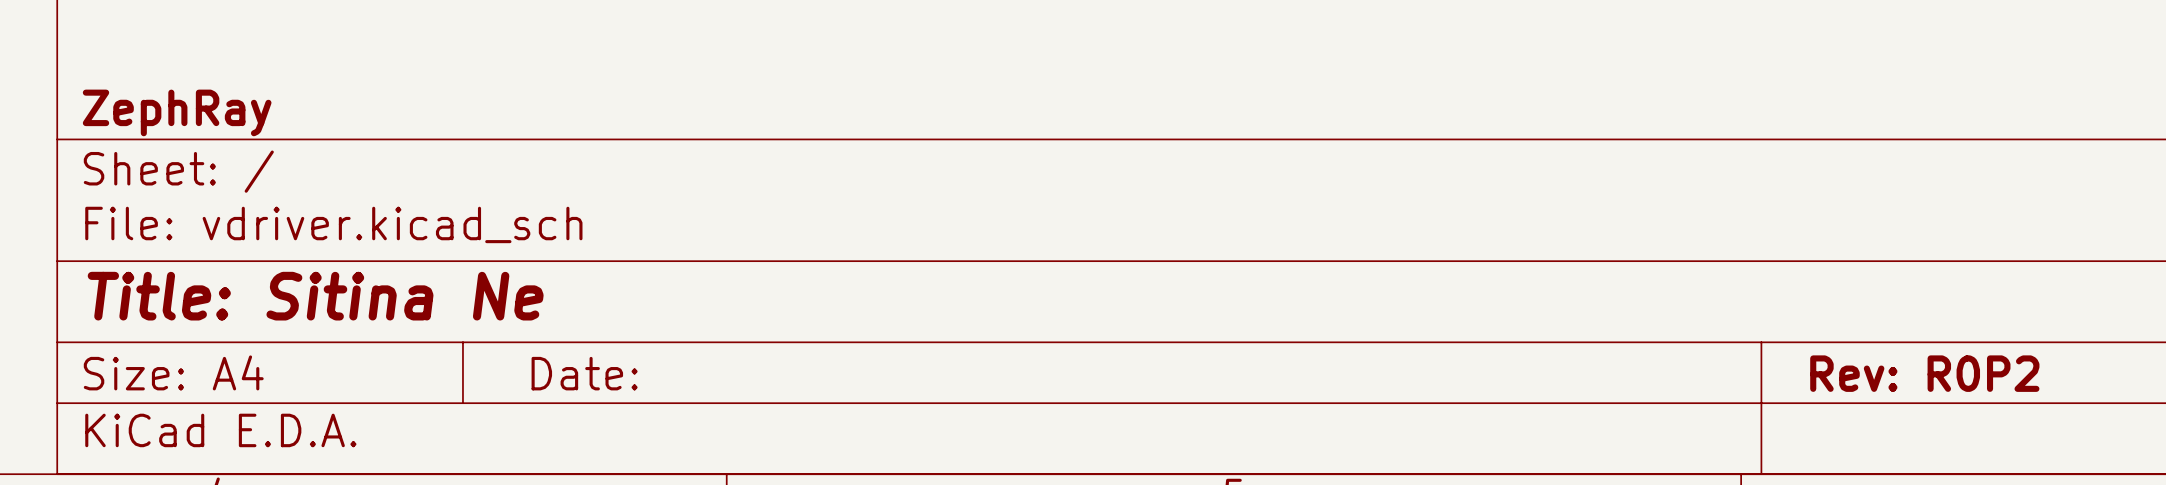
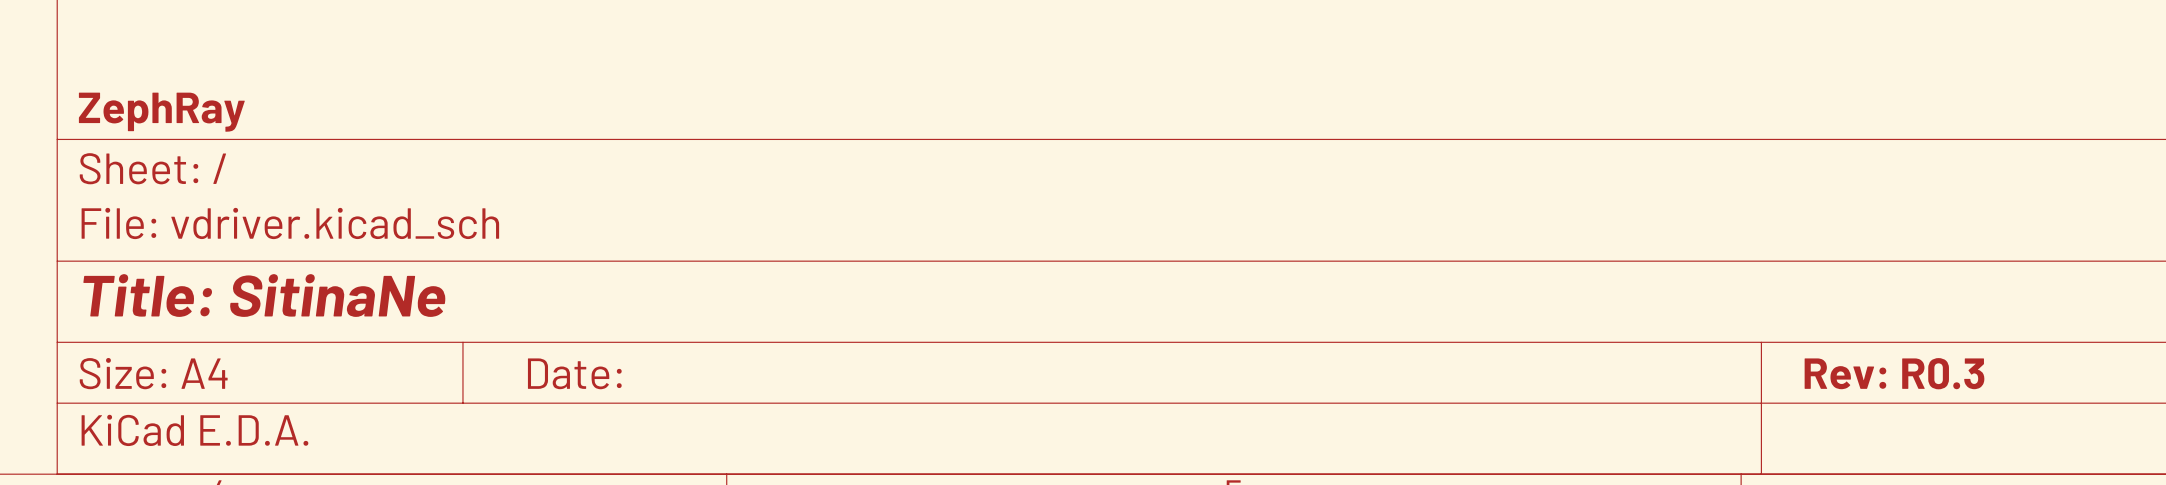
title block: Title: Sitina Ne (315, 296) -> Title: SitinaNe (264, 295)
title block: Rev: R0P2 (1924, 373) -> Rev: R0.3 (1894, 373)

